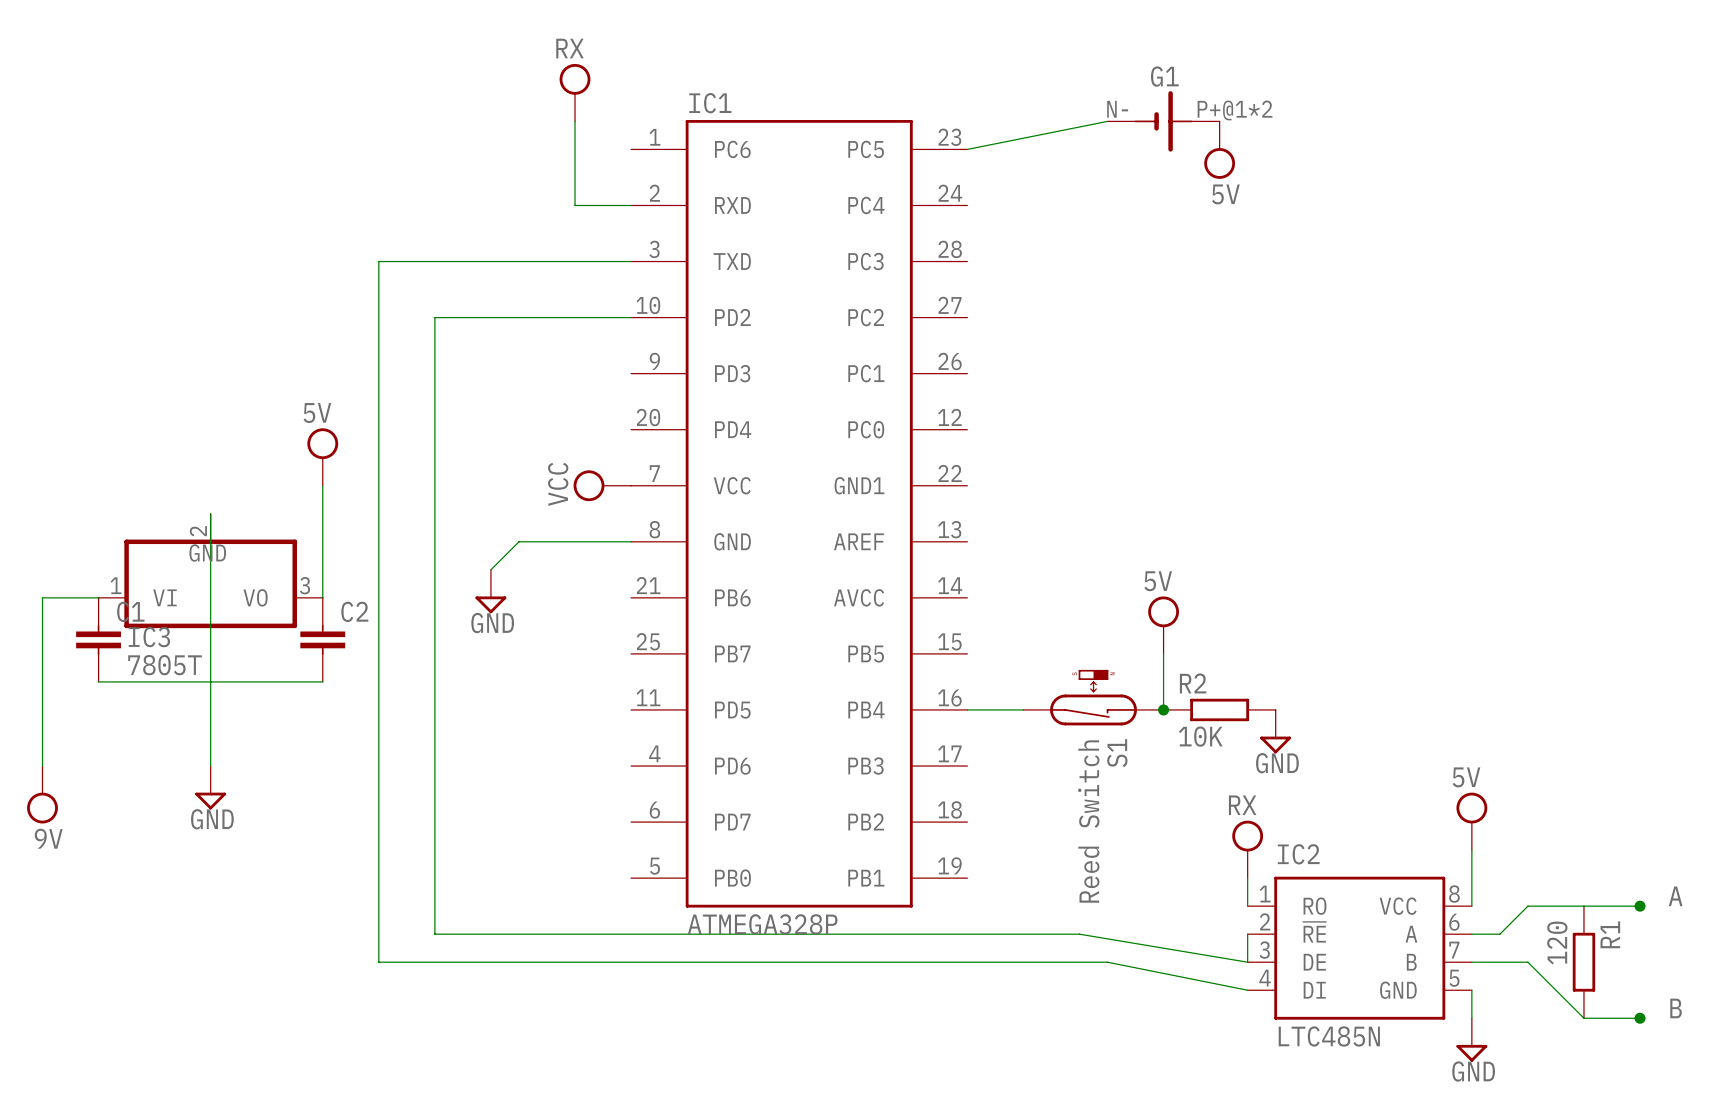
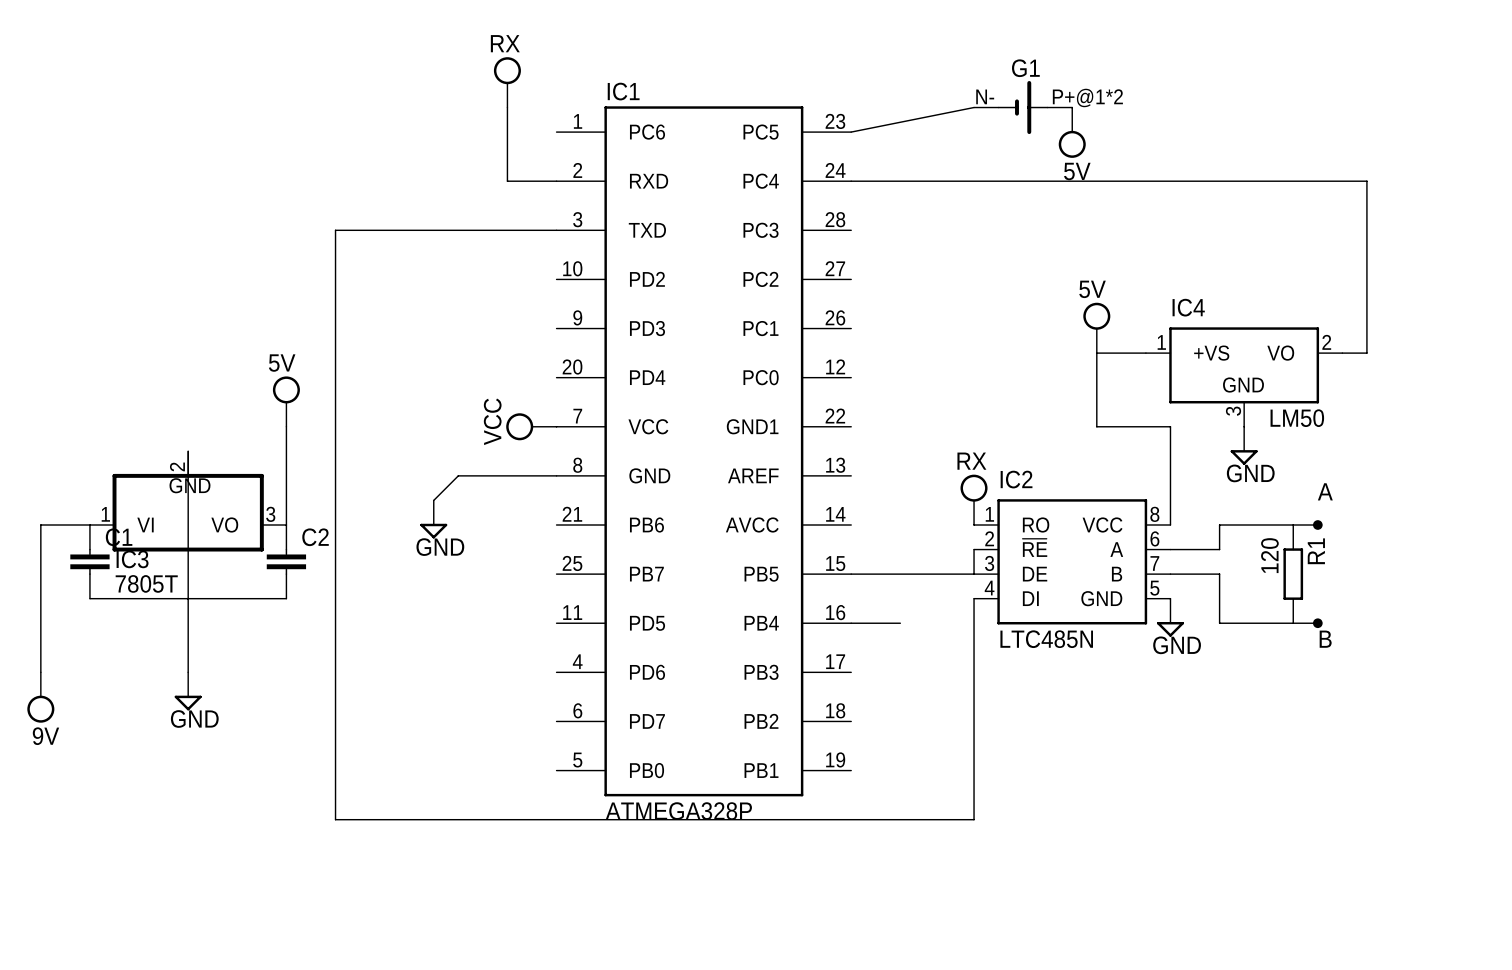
wire: none -> (851, 181) (1366, 181) (1366, 353) (1342, 353)
wire: (631, 317) (434, 317) (434, 934) -> (335, 819) (384, 819)
power symbol: none -> 5V (1096, 327)
wire: none -> (1145, 353) (1096, 353) (1096, 426) (1170, 426) (1170, 525)
IC4: none -> LM50 (1244, 377)
power symbol: none -> GND (1244, 445)
label: none -> A (1325, 491)
power symbol: none -> RX (974, 499)
wire: none -> (1317, 525) (1219, 525) (1219, 549) (1170, 549)
junction: none -> (1317, 525)
wire: none -> (974, 549) (974, 574) (851, 574)
power symbol: 5V (1163, 625) -> none
wire: (1163, 653) (1163, 709) -> none
wire: none -> (1170, 574) (1219, 574) (1219, 623) (1317, 623)
S1: Reed Switch (1093, 697) -> none
junction: (1163, 709) -> none
R2: 10K (1219, 709) -> none
junction: none -> (1317, 623)
label: none -> B (1325, 639)
power symbol position: GND (1275, 731) -> GND (1170, 617)
power symbol: 5V (1471, 821) -> none
power symbol: RX (1247, 849) -> none
wire: (1471, 850) (1471, 906) -> none
wire: (1247, 878) (1247, 906) -> none
label: A (1675, 896) -> none
wire: (1640, 906) (1527, 906) (1499, 934) (1471, 934) -> none
junction: (1640, 906) -> none
wire: (378, 934) (378, 962) (1107, 962) (1247, 990) -> none
wire: (1079, 934) (1247, 962) (1247, 934) -> (949, 819) (974, 819) (974, 598)
IC2 position: (1359, 948) -> (1072, 561)
wire: (1471, 962) (1527, 962) (1583, 1018) (1640, 1018) -> none
R1 position: (1583, 962) -> (1293, 574)
wire: (1471, 990) (1471, 1018) -> none
label: B (1676, 1008) -> none
junction: (1640, 1018) -> none
power symbol: GND (1471, 1039) -> none

